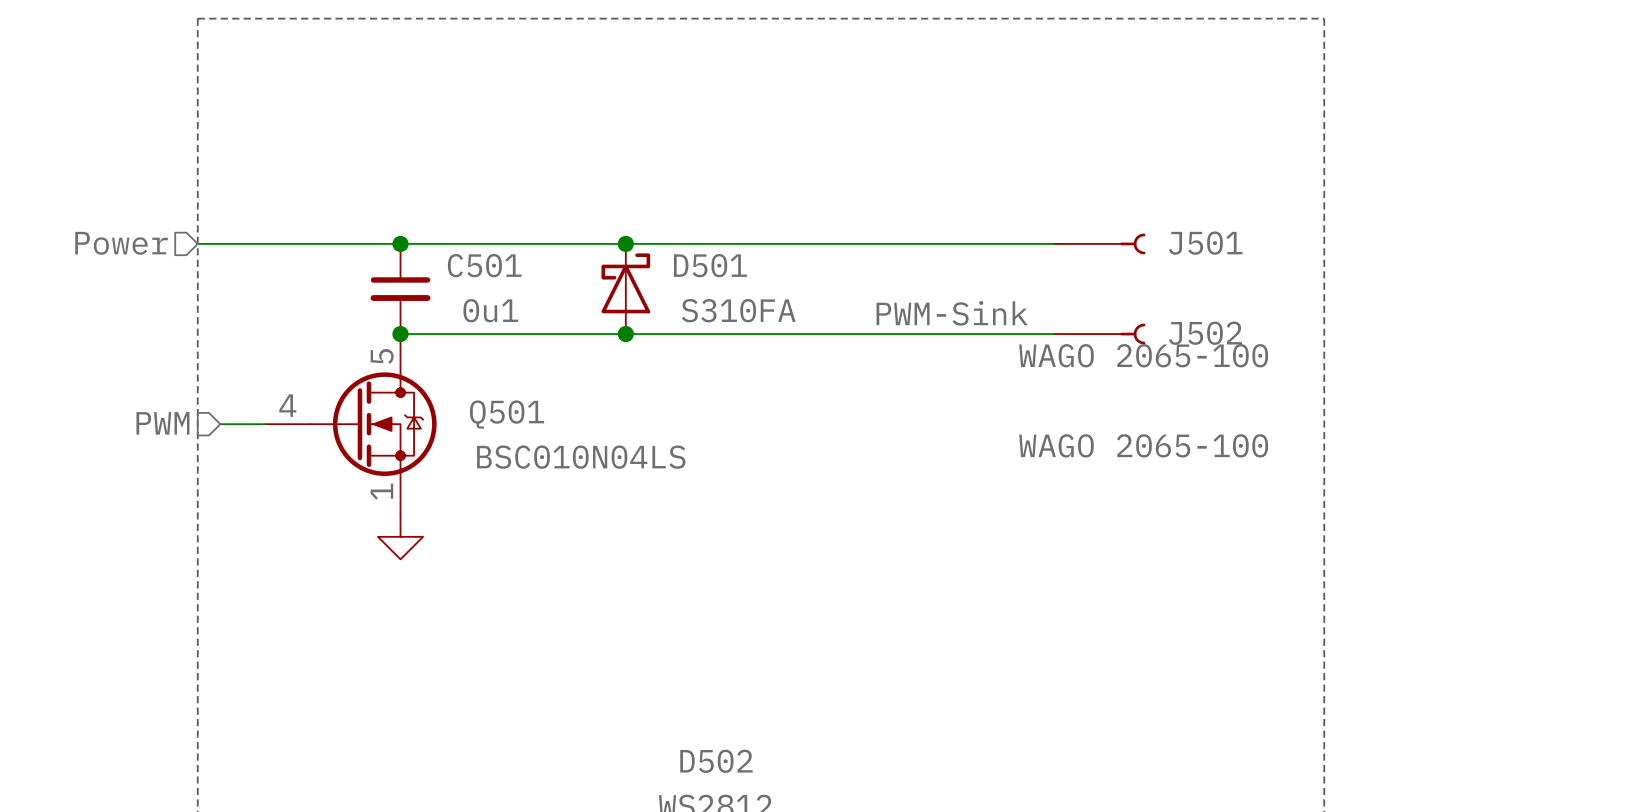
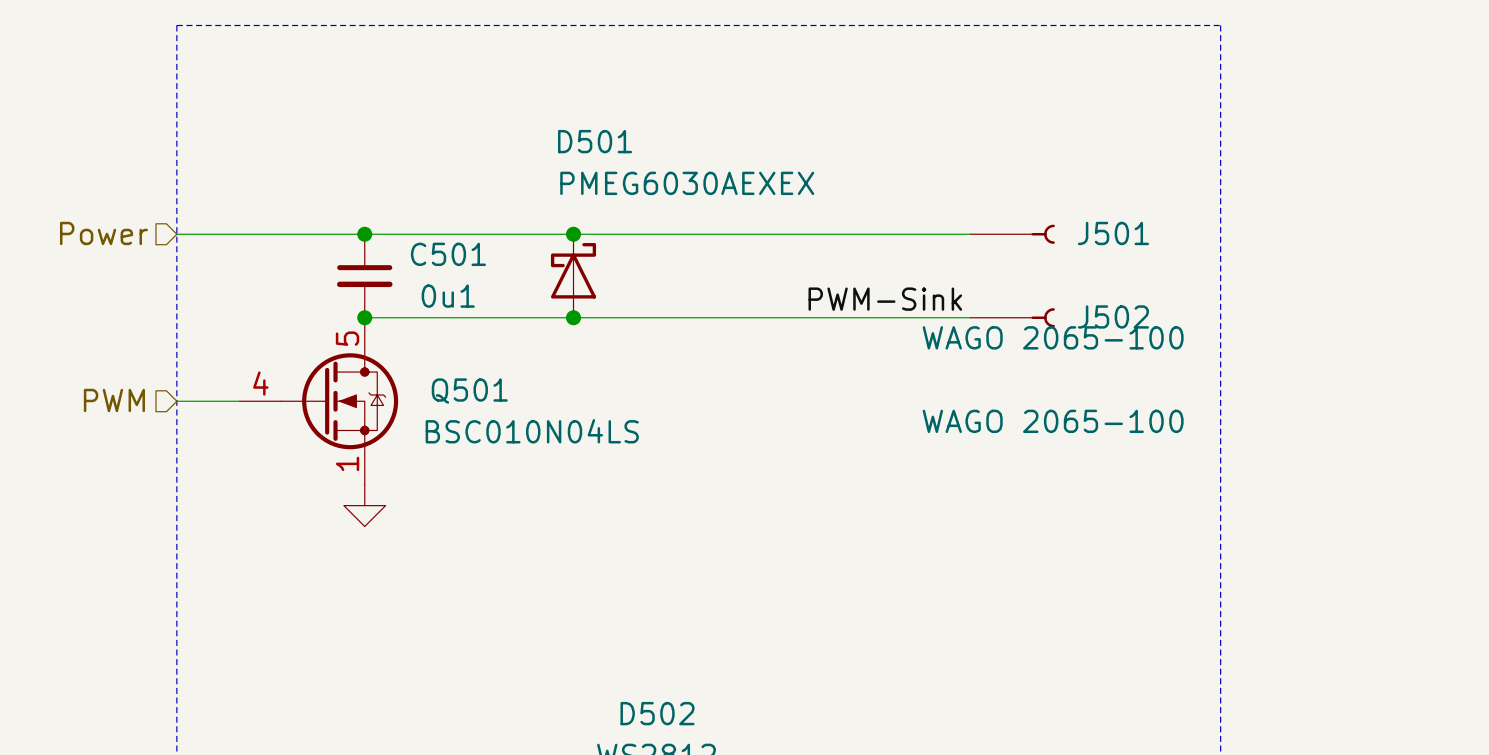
D501 name position: D501 (710, 265) -> D501 (595, 141)
D501 value: S310FA (738, 310) -> PMEG6030AEXEX (687, 183)
hierarchical label position: PWM (162, 423) -> PWM (114, 400)
wire: none -> (176, 401) (197, 401)

